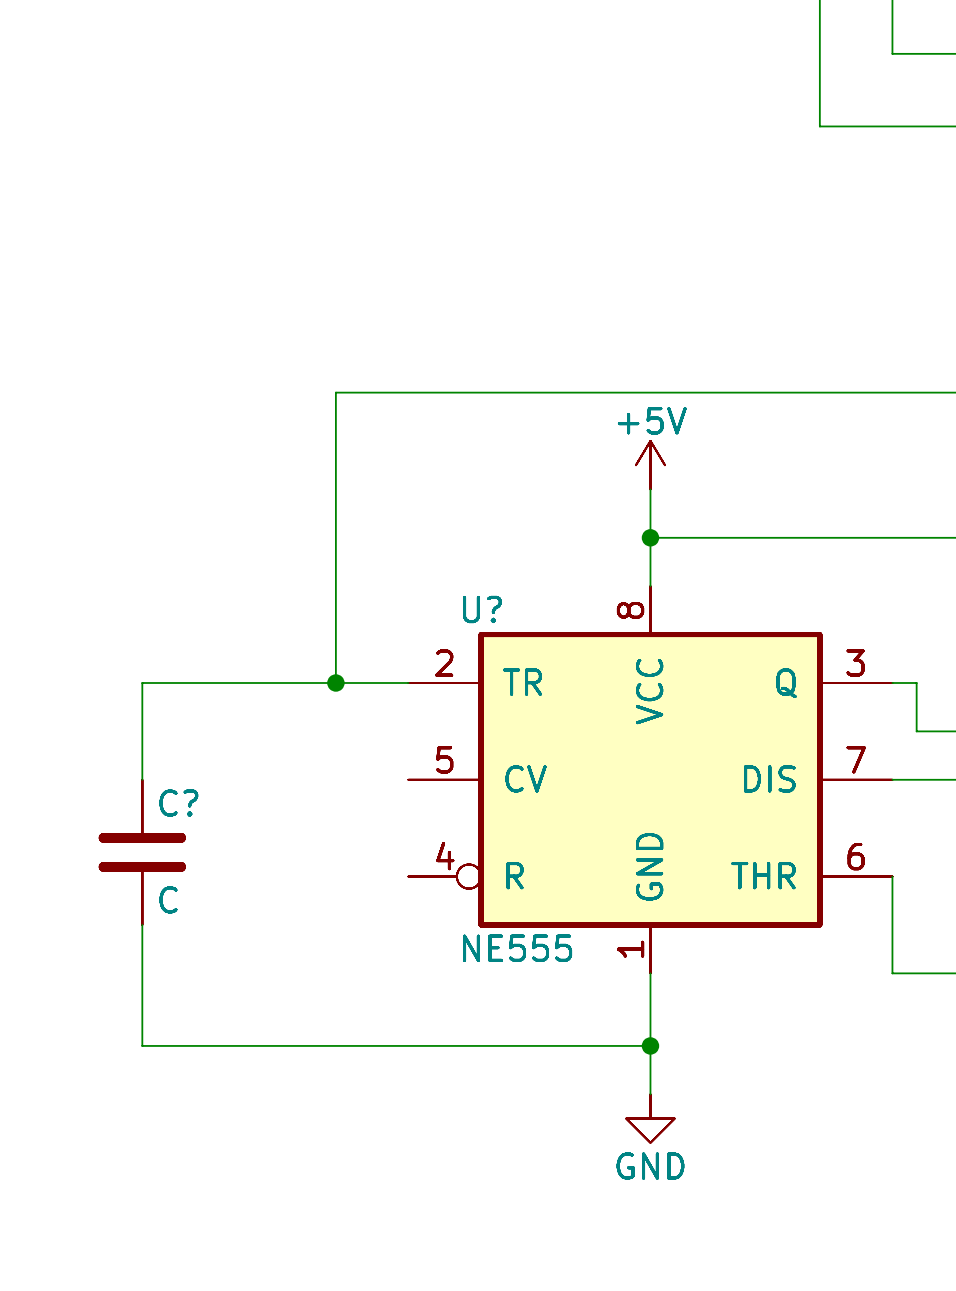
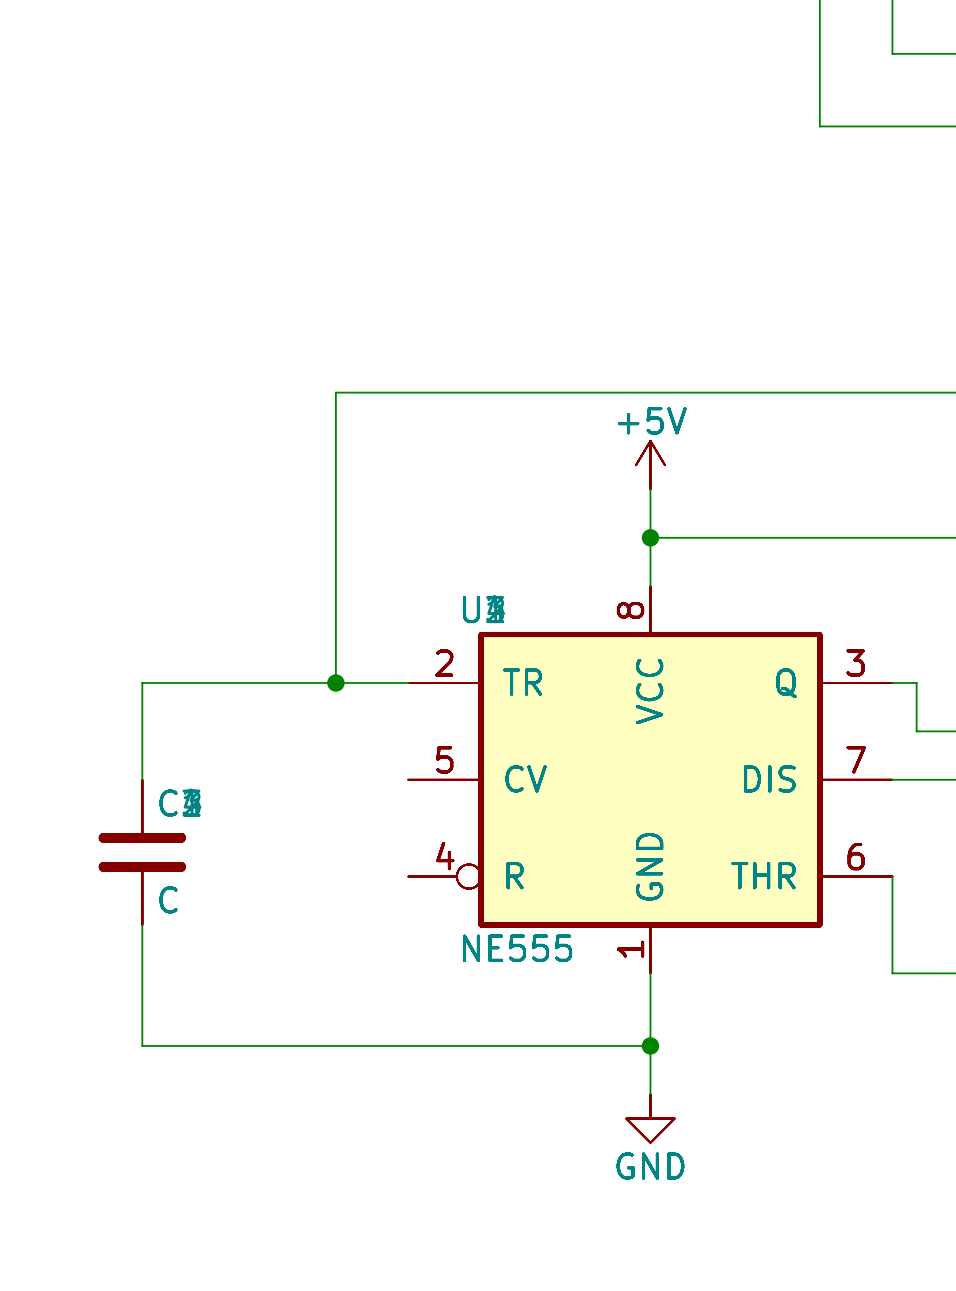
U?: NE555 (650, 779) -> none
part: none -> NE555 (650, 779)
part: none -> NE555 (650, 779)
part: none -> NE555 (650, 779)
part: none -> NE555 (650, 779)
C?: C (142, 852) -> none
part: none -> C (142, 852)
part: none -> C (142, 852)
part: none -> C (142, 852)
part: none -> C (142, 852)

